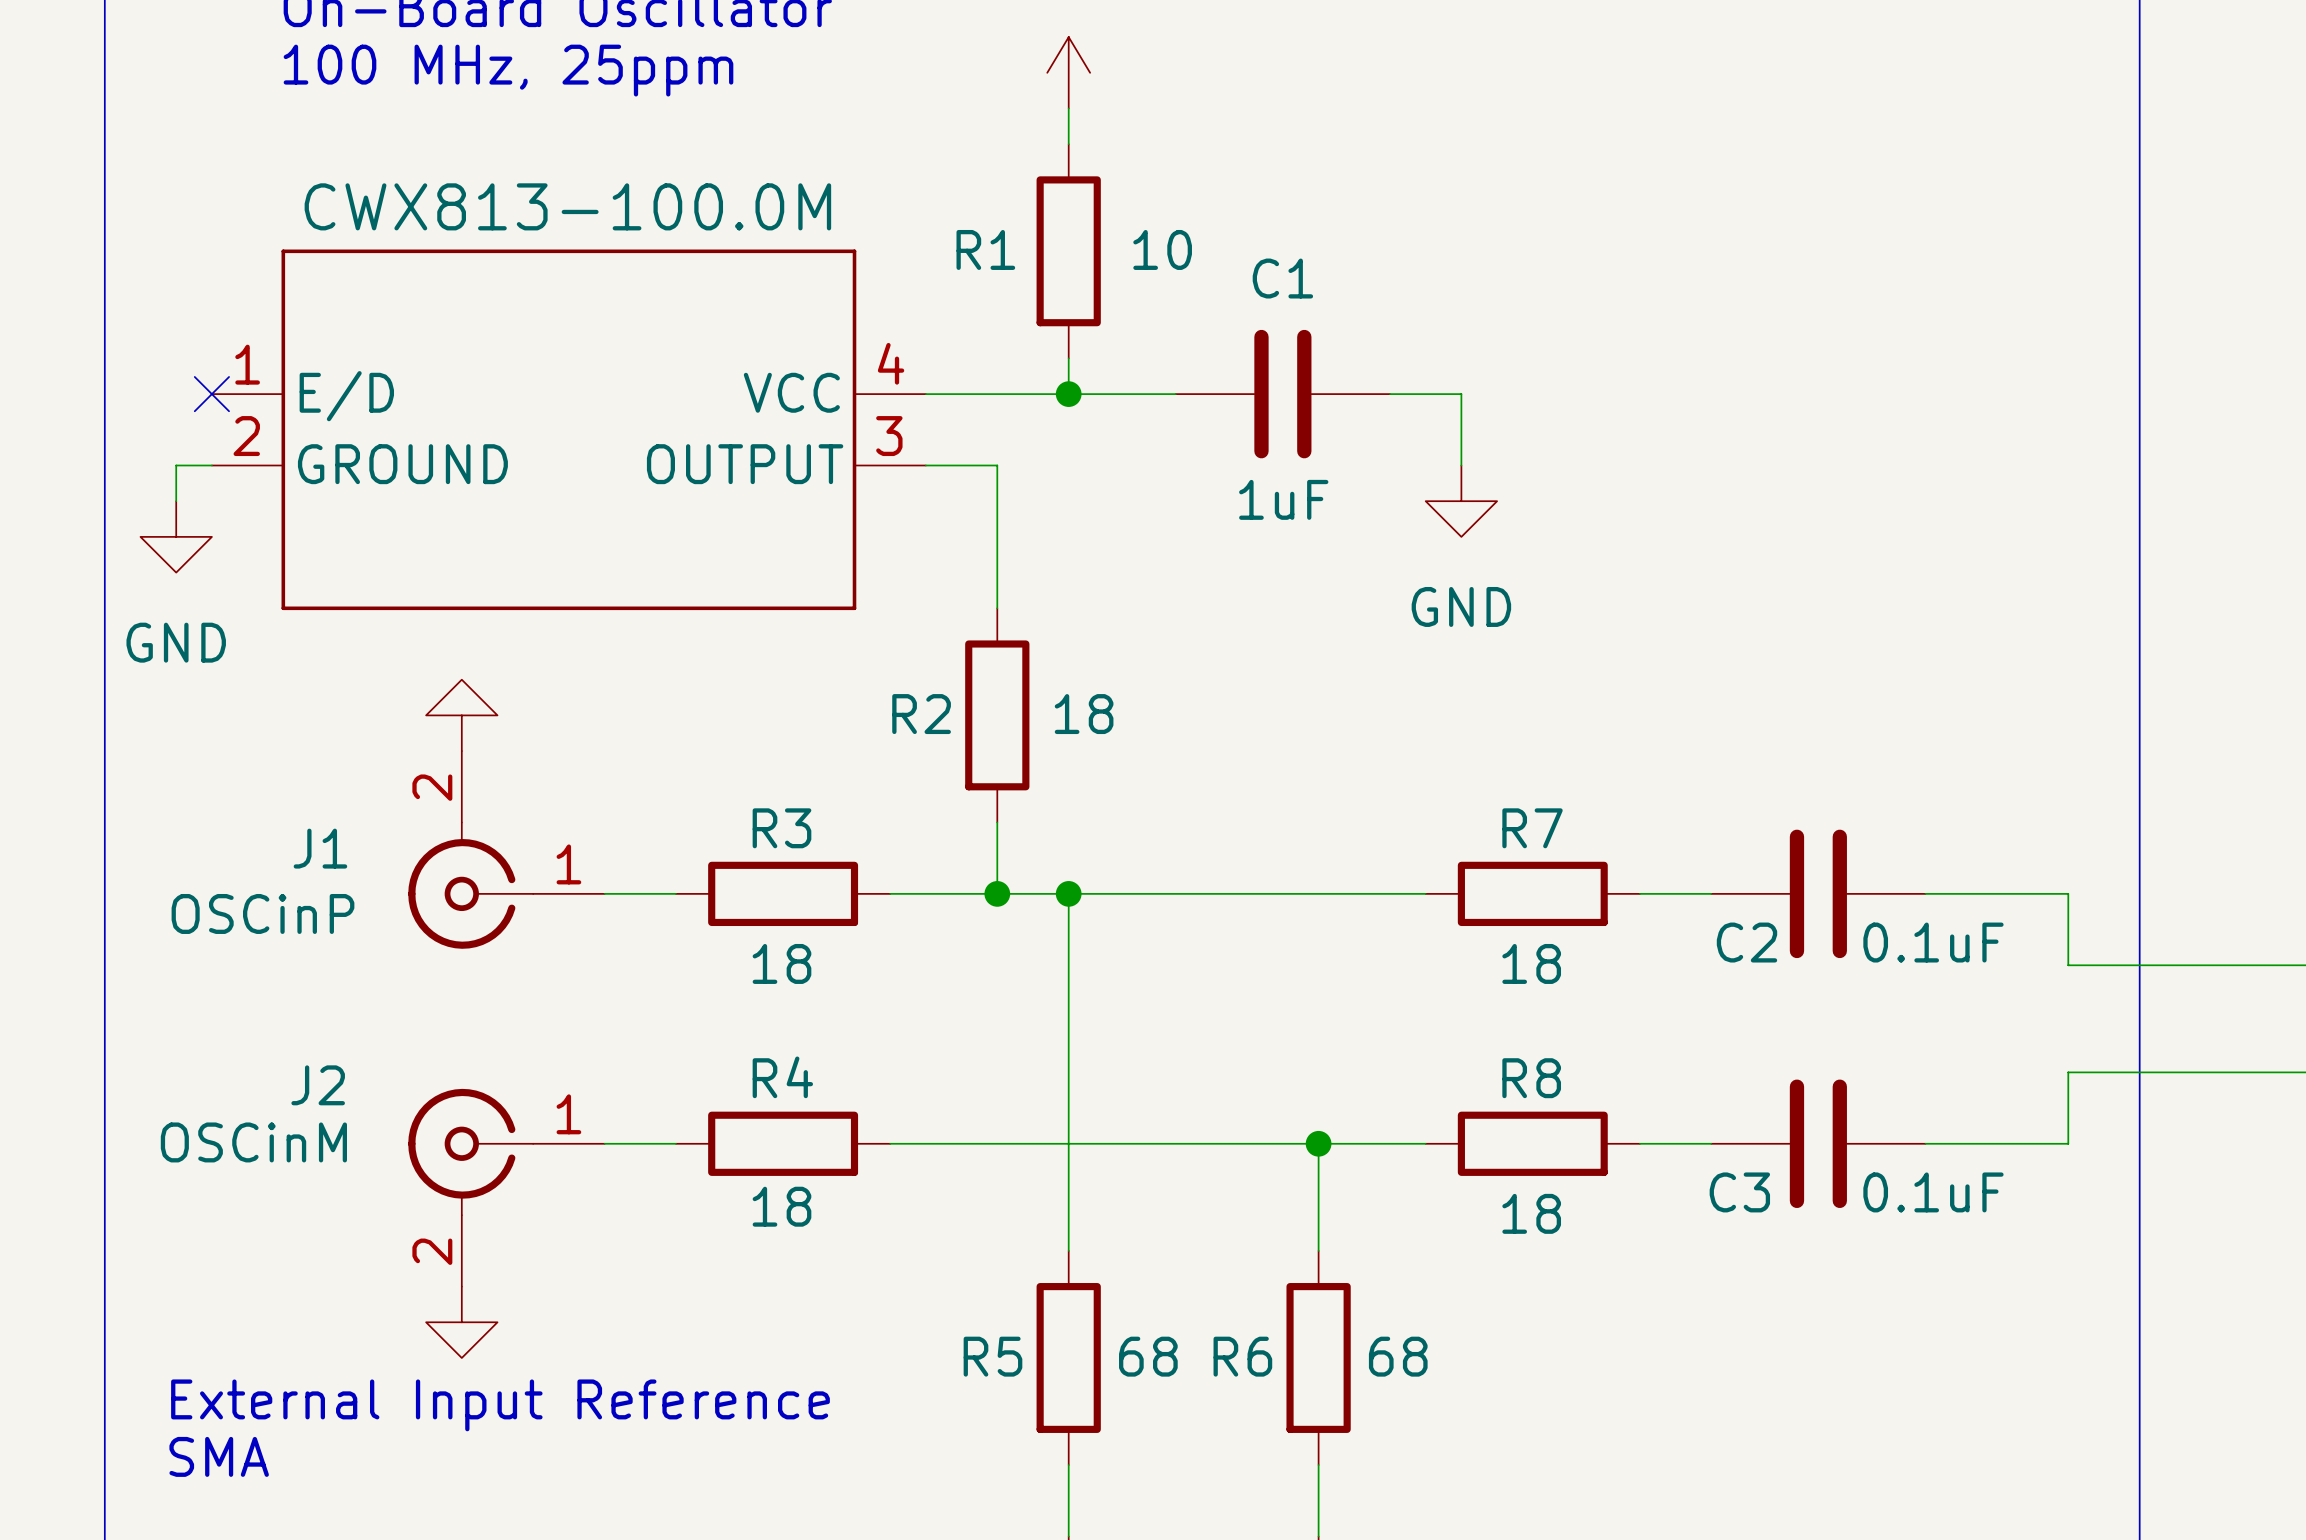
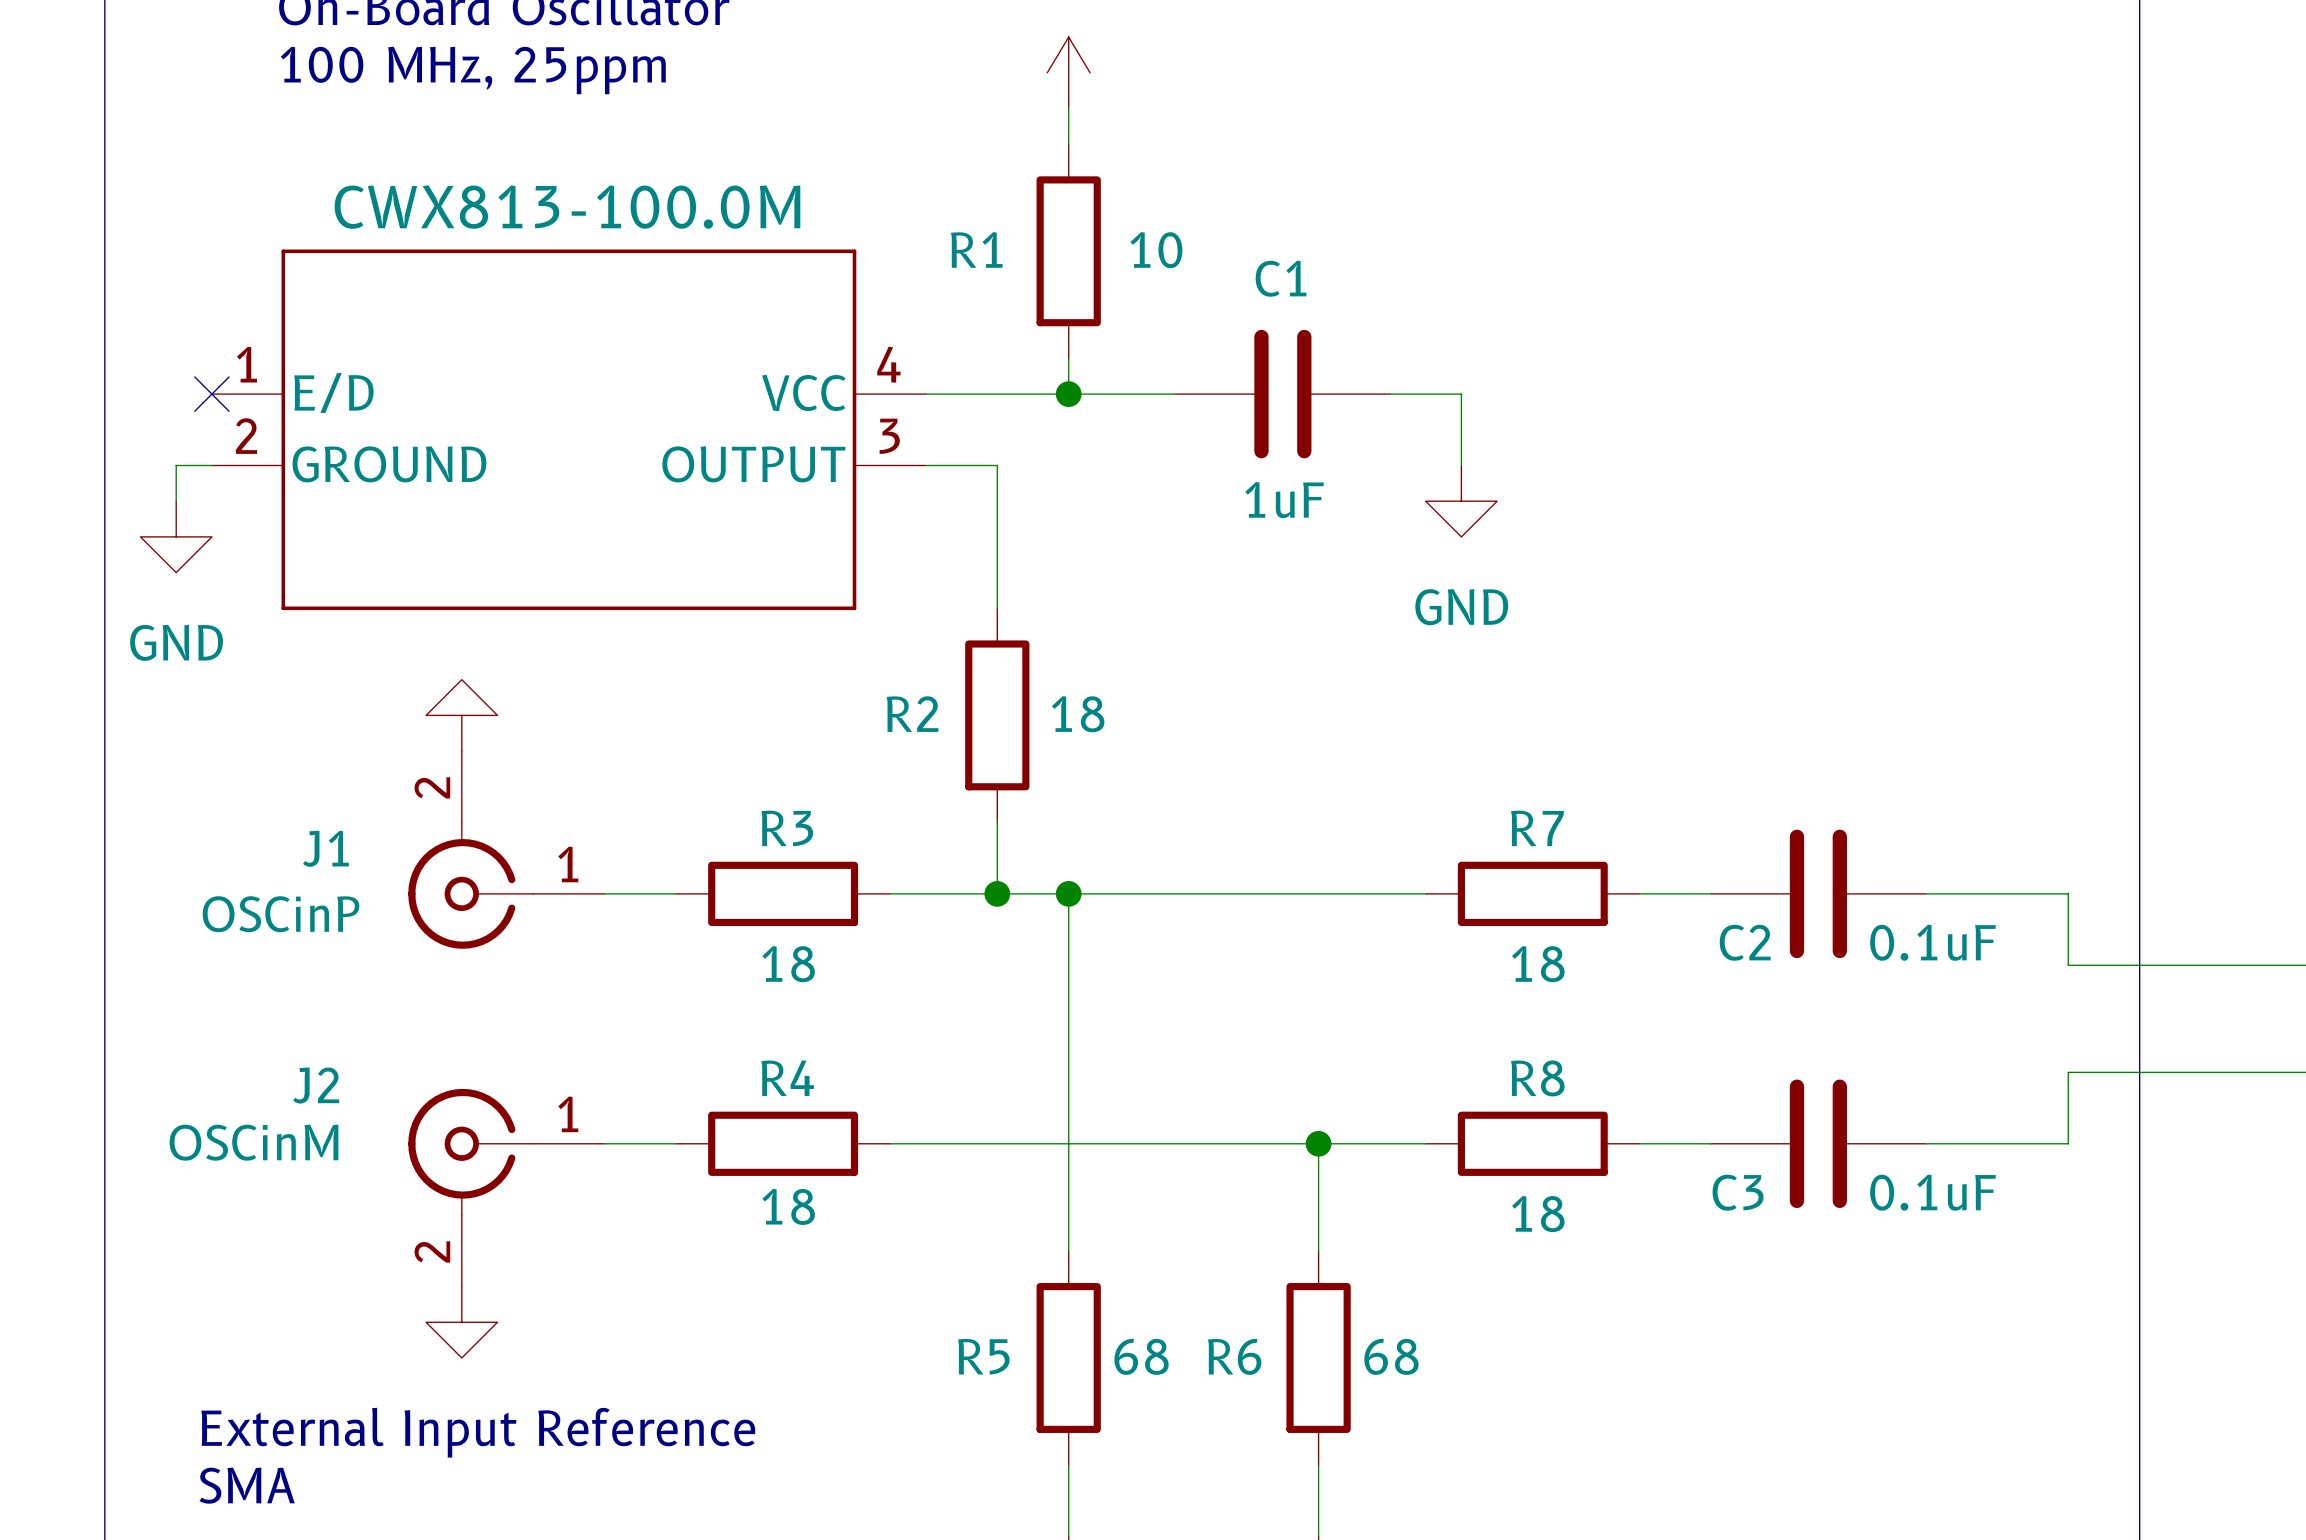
text position: External Input Reference (500, 1405) -> External Input Reference (478, 1432)
text position: SMA (219, 1456) -> SMA (247, 1485)

